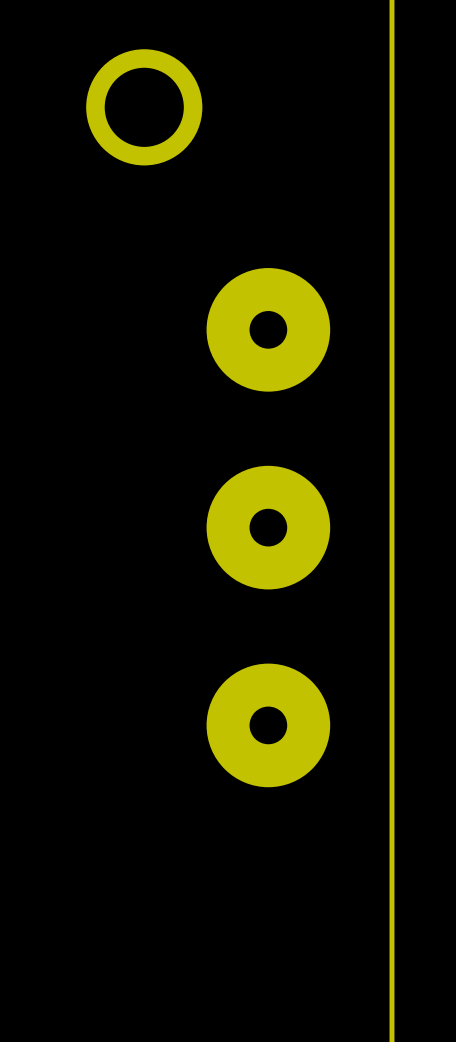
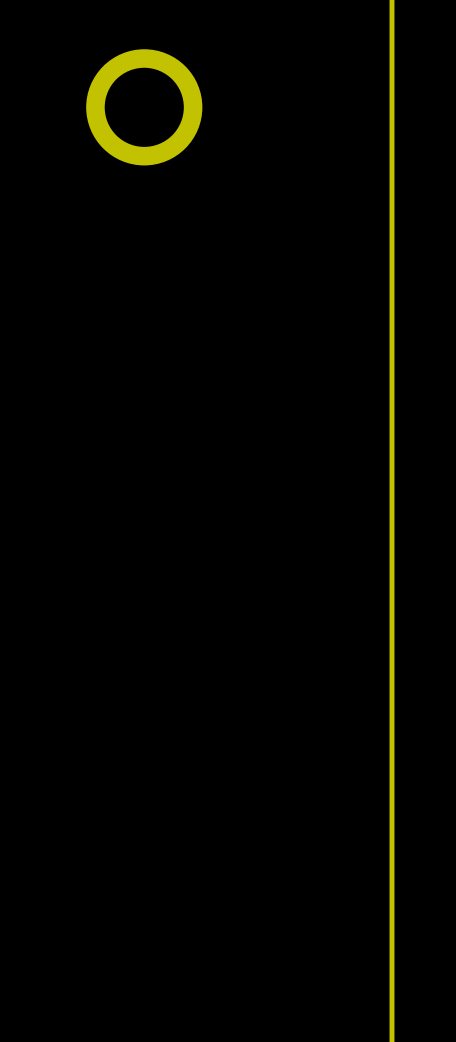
part: (268, 329) -> none
part: (268, 527) -> none
part: (268, 725) -> none

